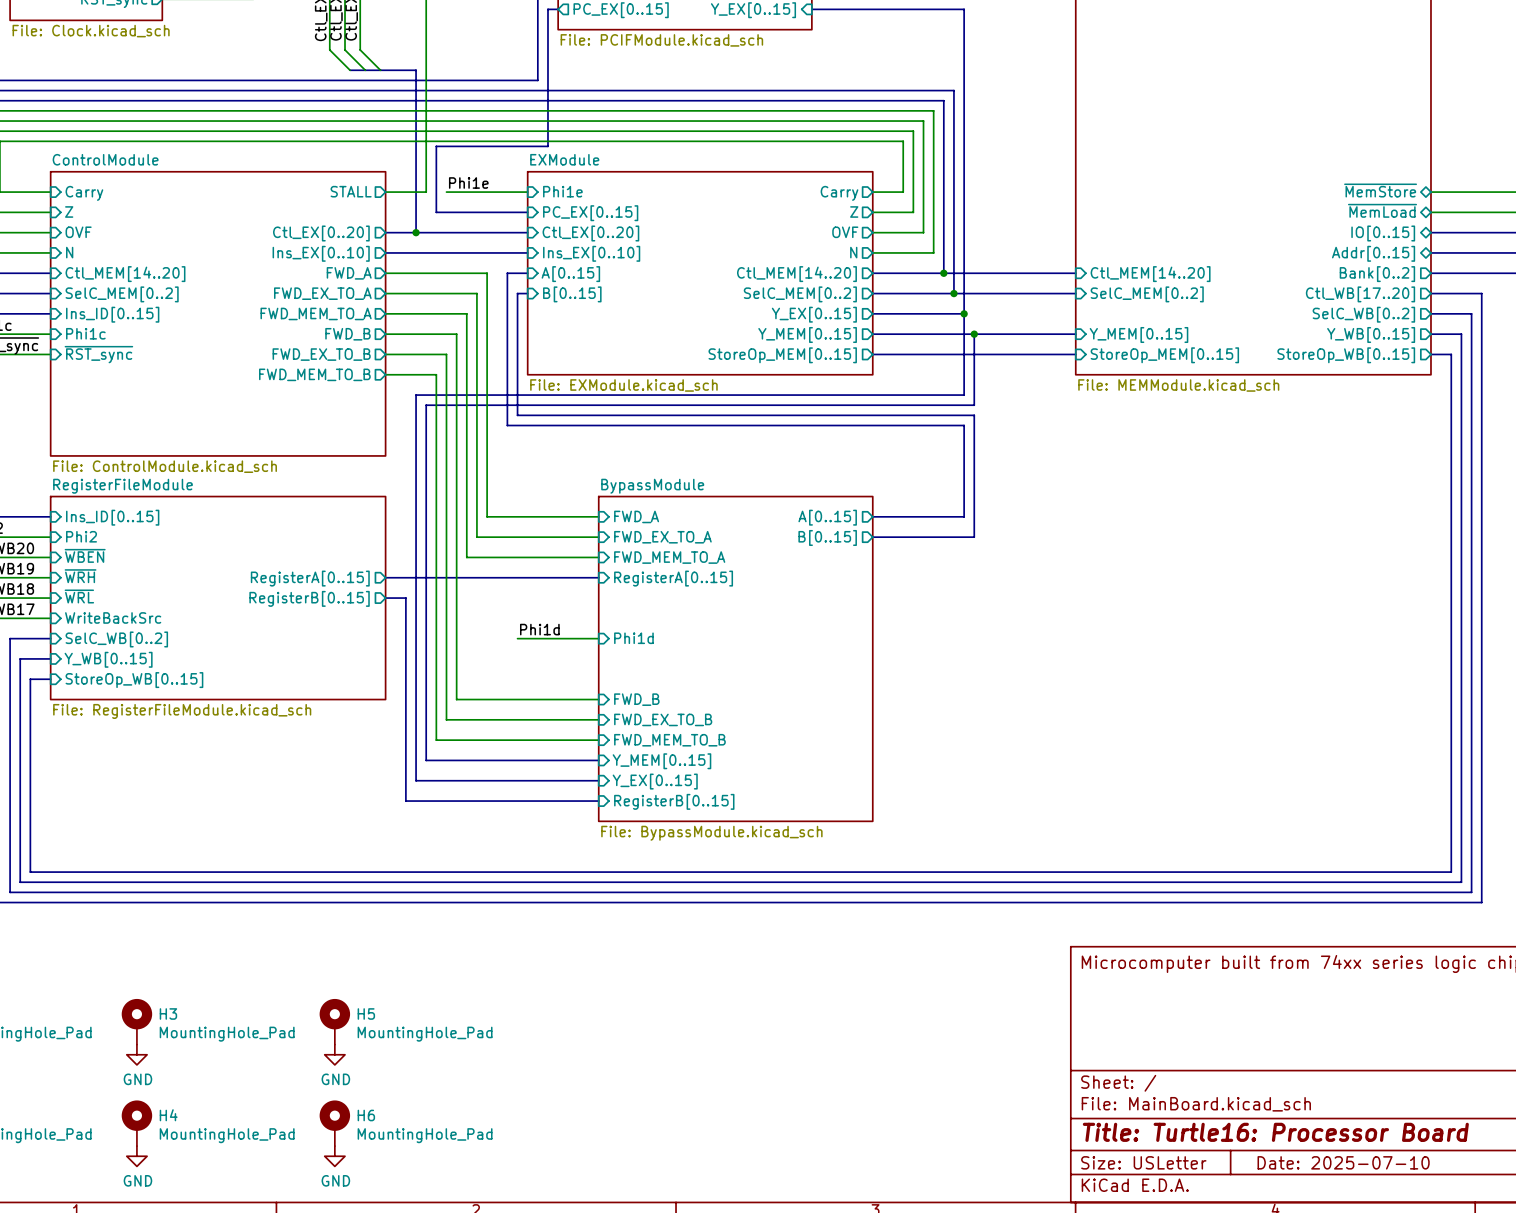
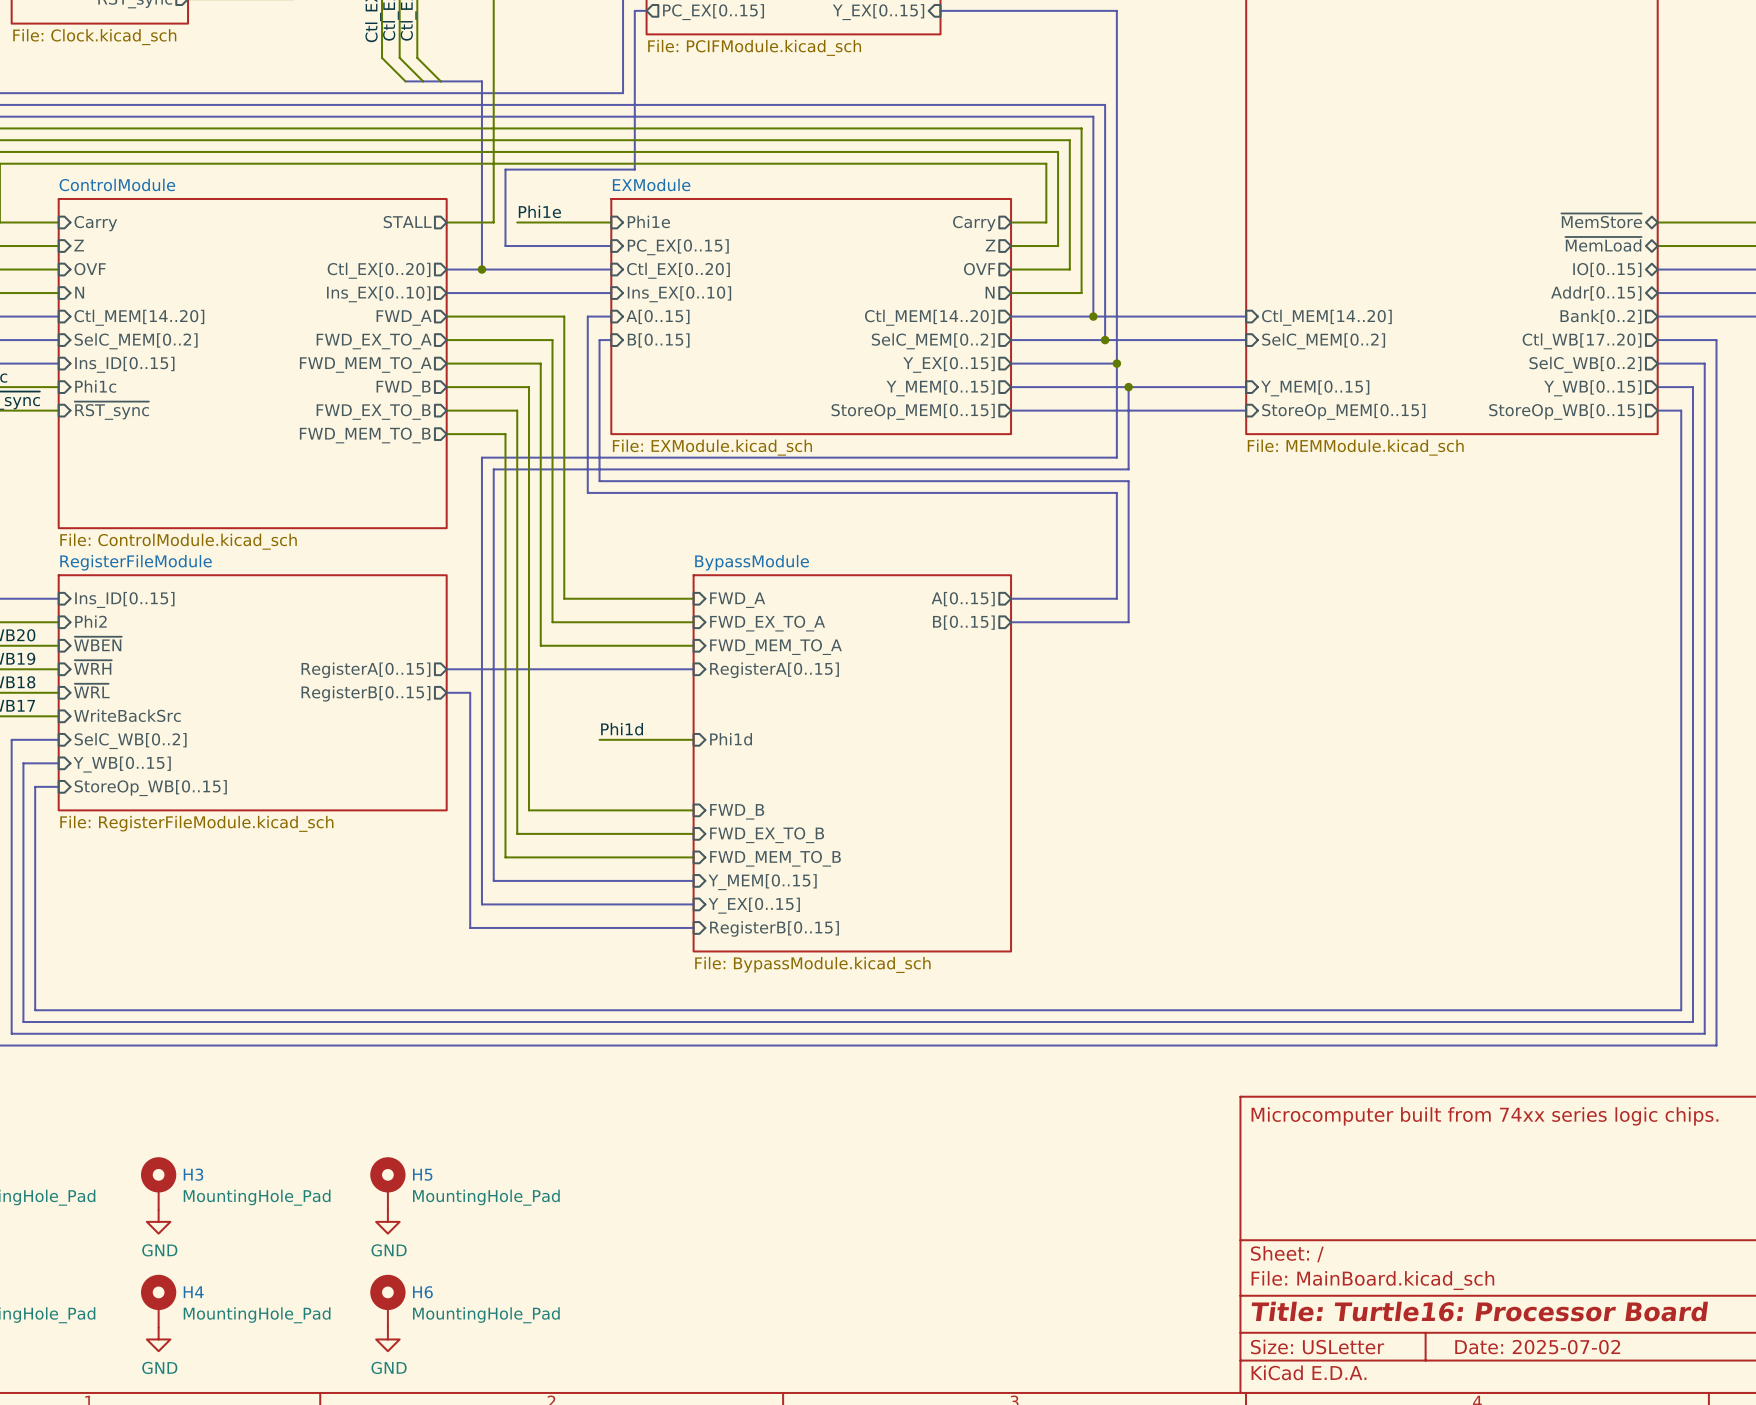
title block: Date: 2025-07-10 (1343, 1162) -> Date: 2025-07-02 (1537, 1347)

